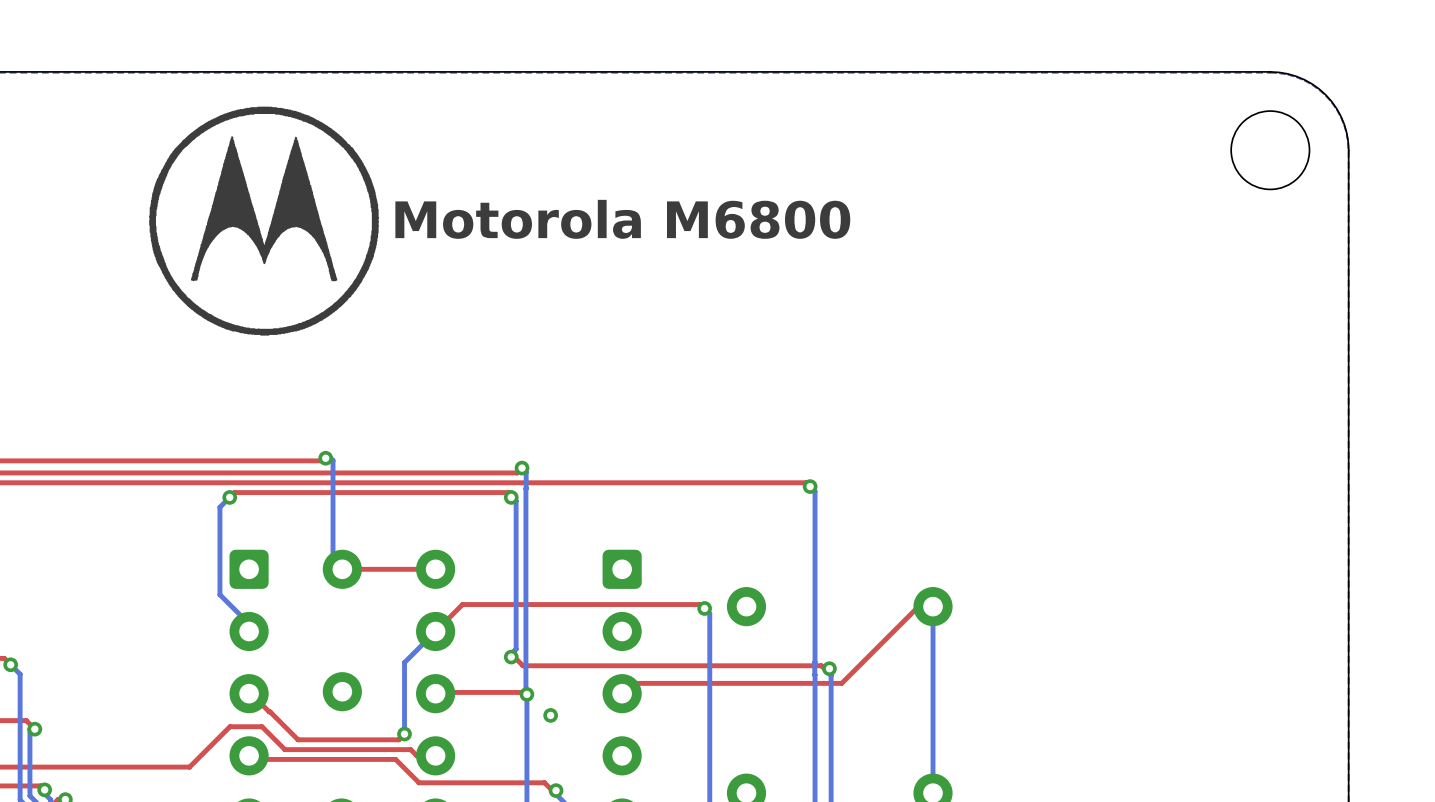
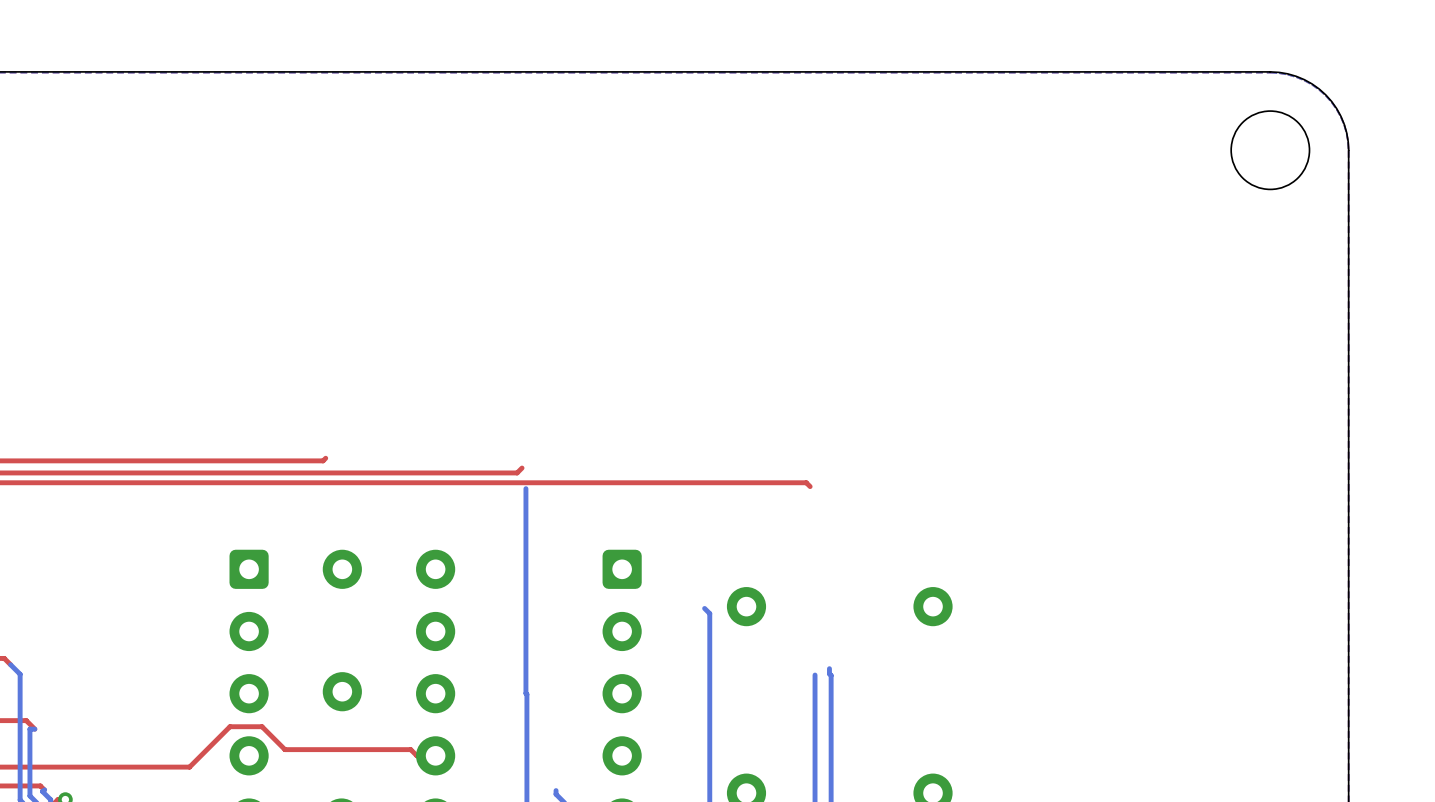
drawing: [149, 106, 380, 336] -> none
text: Motorola M6800 (622, 219) -> none
bottom track: (325, 458) (333, 460) (333, 559) -> none
via: (325, 458) -> none
bottom track: (522, 468) (526, 472) (526, 488) -> none
via: (522, 468) -> none
bottom track: (810, 486) (815, 491) (815, 662) -> none
via: (810, 486) -> none
bottom track: (229, 497) (219, 507) (219, 594) (249, 623) -> none
via: (229, 497) -> none
top track: (511, 497) (509, 492) (234, 492) (229, 497) -> none
bottom track: (511, 497) (516, 500) (516, 649) (511, 654) (511, 657) -> none
via: (511, 497) -> none
top track: (435, 569) (342, 569) -> none
top track: (918, 606) (841, 683) (632, 683) -> none
bottom track: (933, 606) (933, 793) -> none
top track: (704, 608) (700, 604) (462, 604) (435, 631) -> none
via: (704, 608) -> none
bottom track: (435, 631) (404, 662) (404, 734) -> none
top track: (511, 657) (514, 657) (523, 665) (821, 665) (824, 668) (829, 668) -> none
via: (511, 657) -> none
bottom track: (814, 662) (814, 674) -> none
via: (10, 664) -> none
via: (829, 668) -> none
top track: (436, 692) (524, 692) (526, 694) -> none
top track: (251, 693) (298, 739) (398, 739) (404, 734) -> none
via: (526, 694) -> none
via: (550, 715) -> none
via: (34, 729) -> none
via: (404, 734) -> none
top track: (265, 759) (395, 759) (419, 782) (544, 782) (552, 790) (556, 790) -> none
via: (44, 789) -> none
via: (556, 790) -> none

